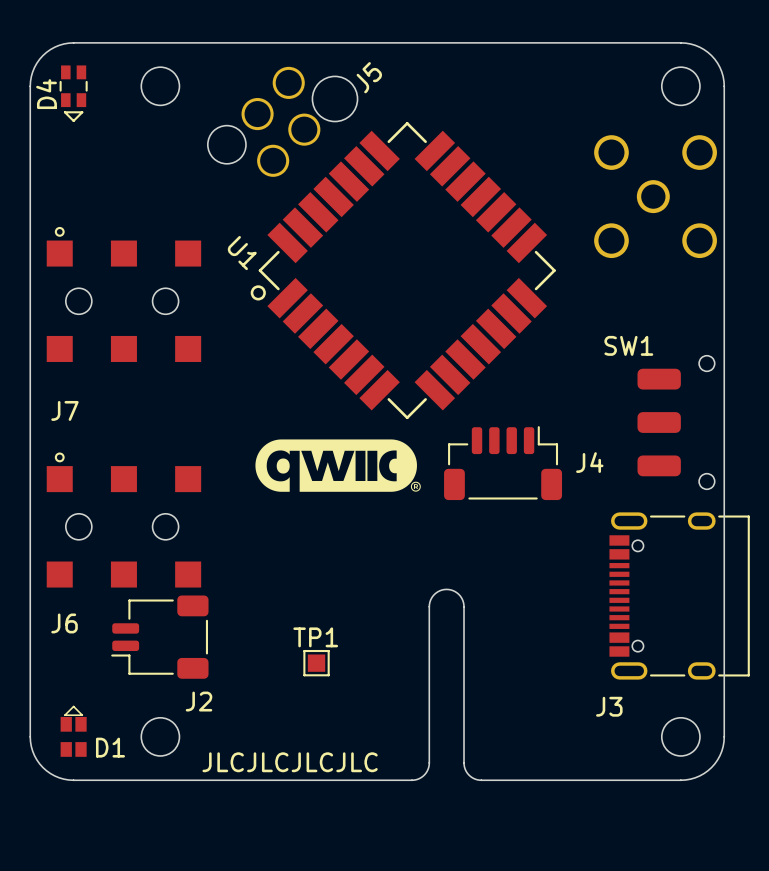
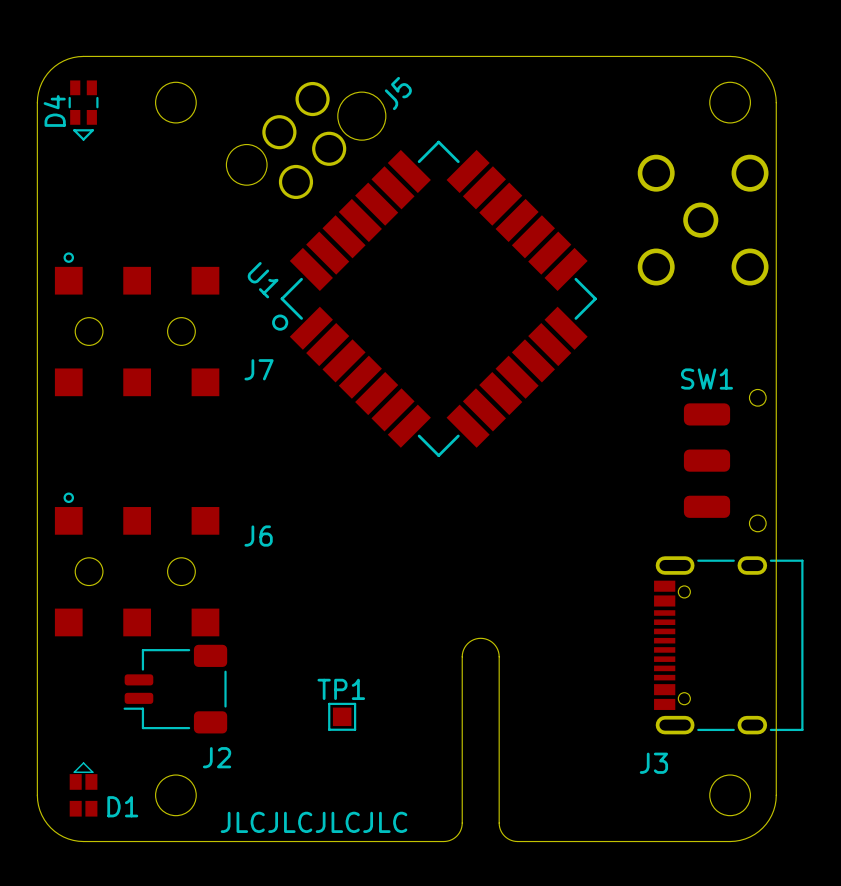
SW1 name position: SW1 (628, 345) -> SW1 (707, 379)
J7 name position: J7 (64, 410) -> J7 (259, 369)
drawing: [255, 439, 421, 492] -> none
J4: (503, 463) -> none
J6 name position: J6 (64, 623) -> J6 (258, 536)

